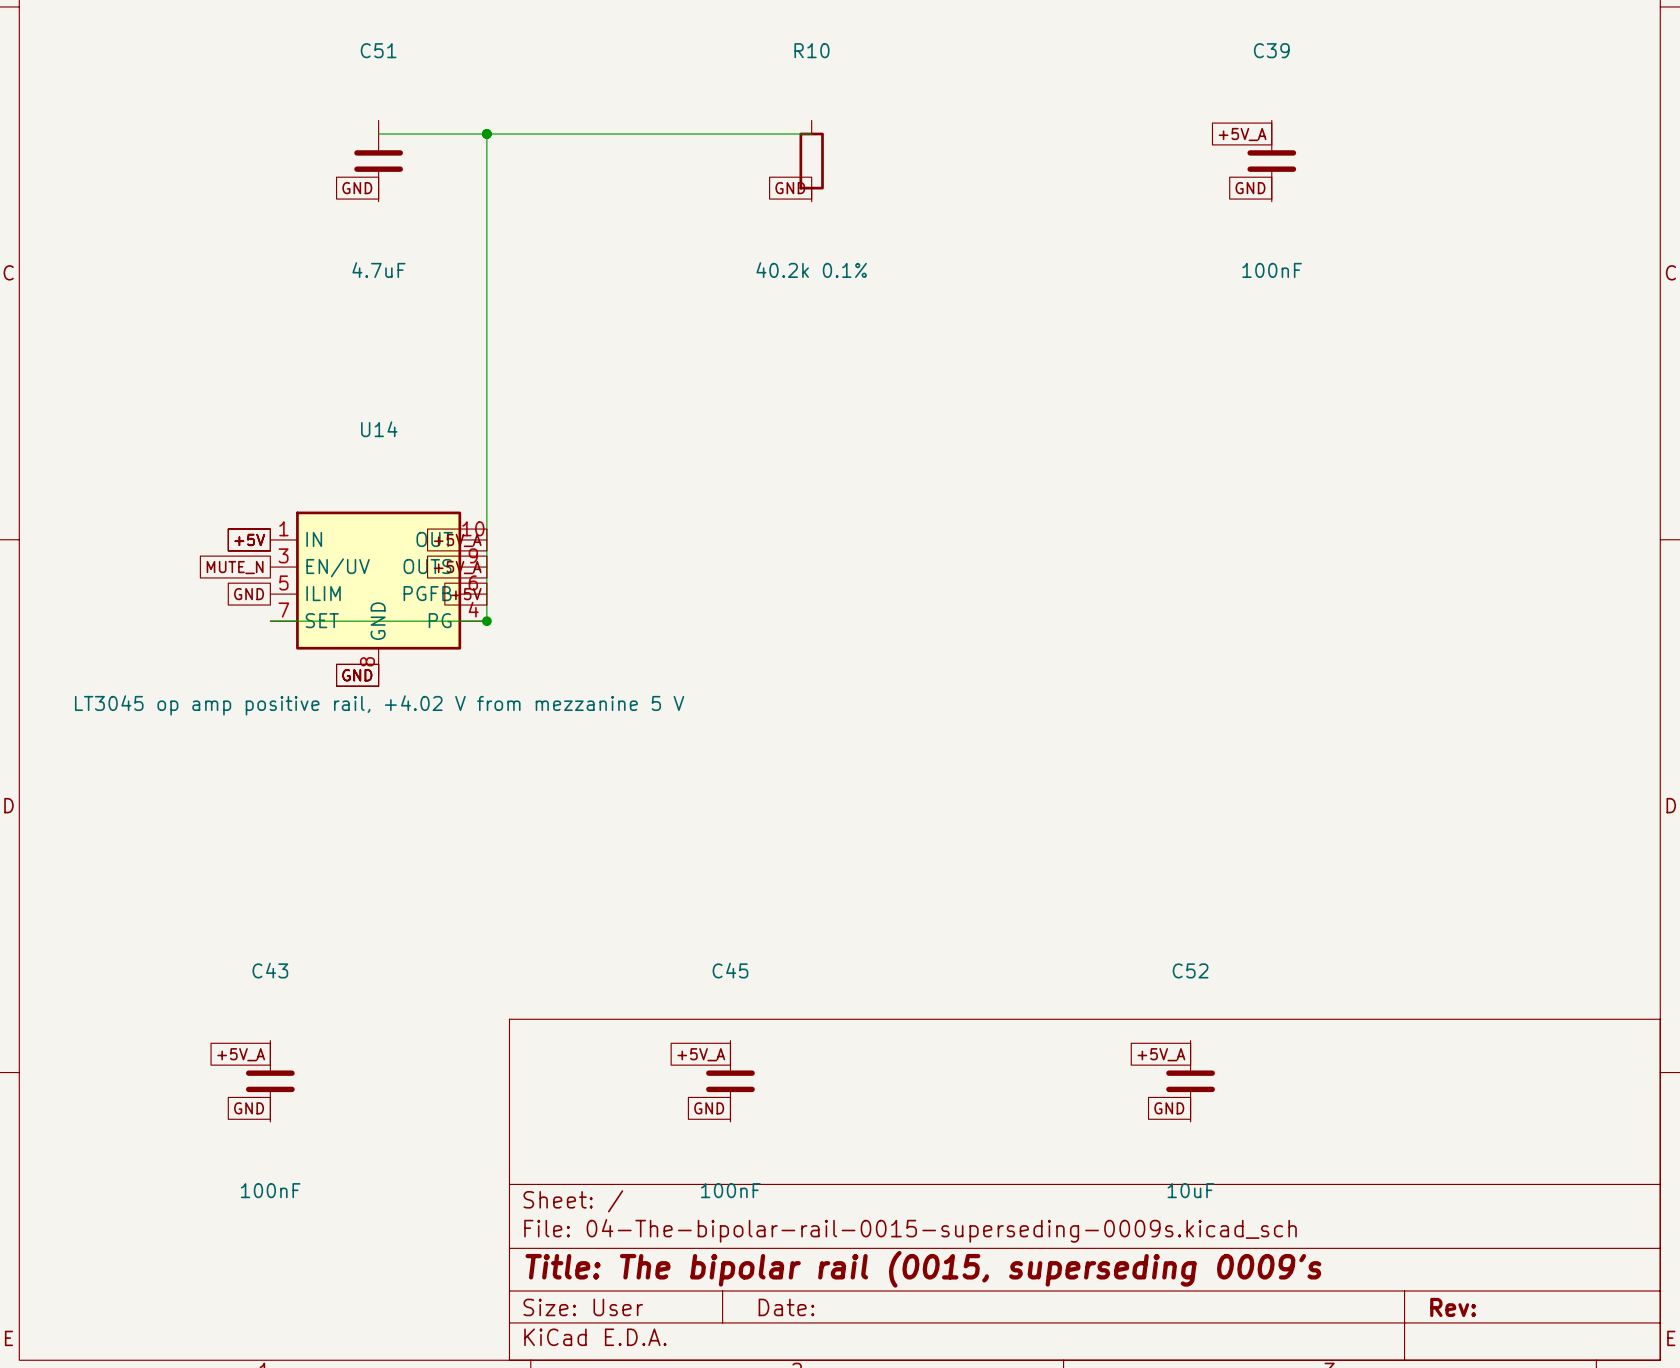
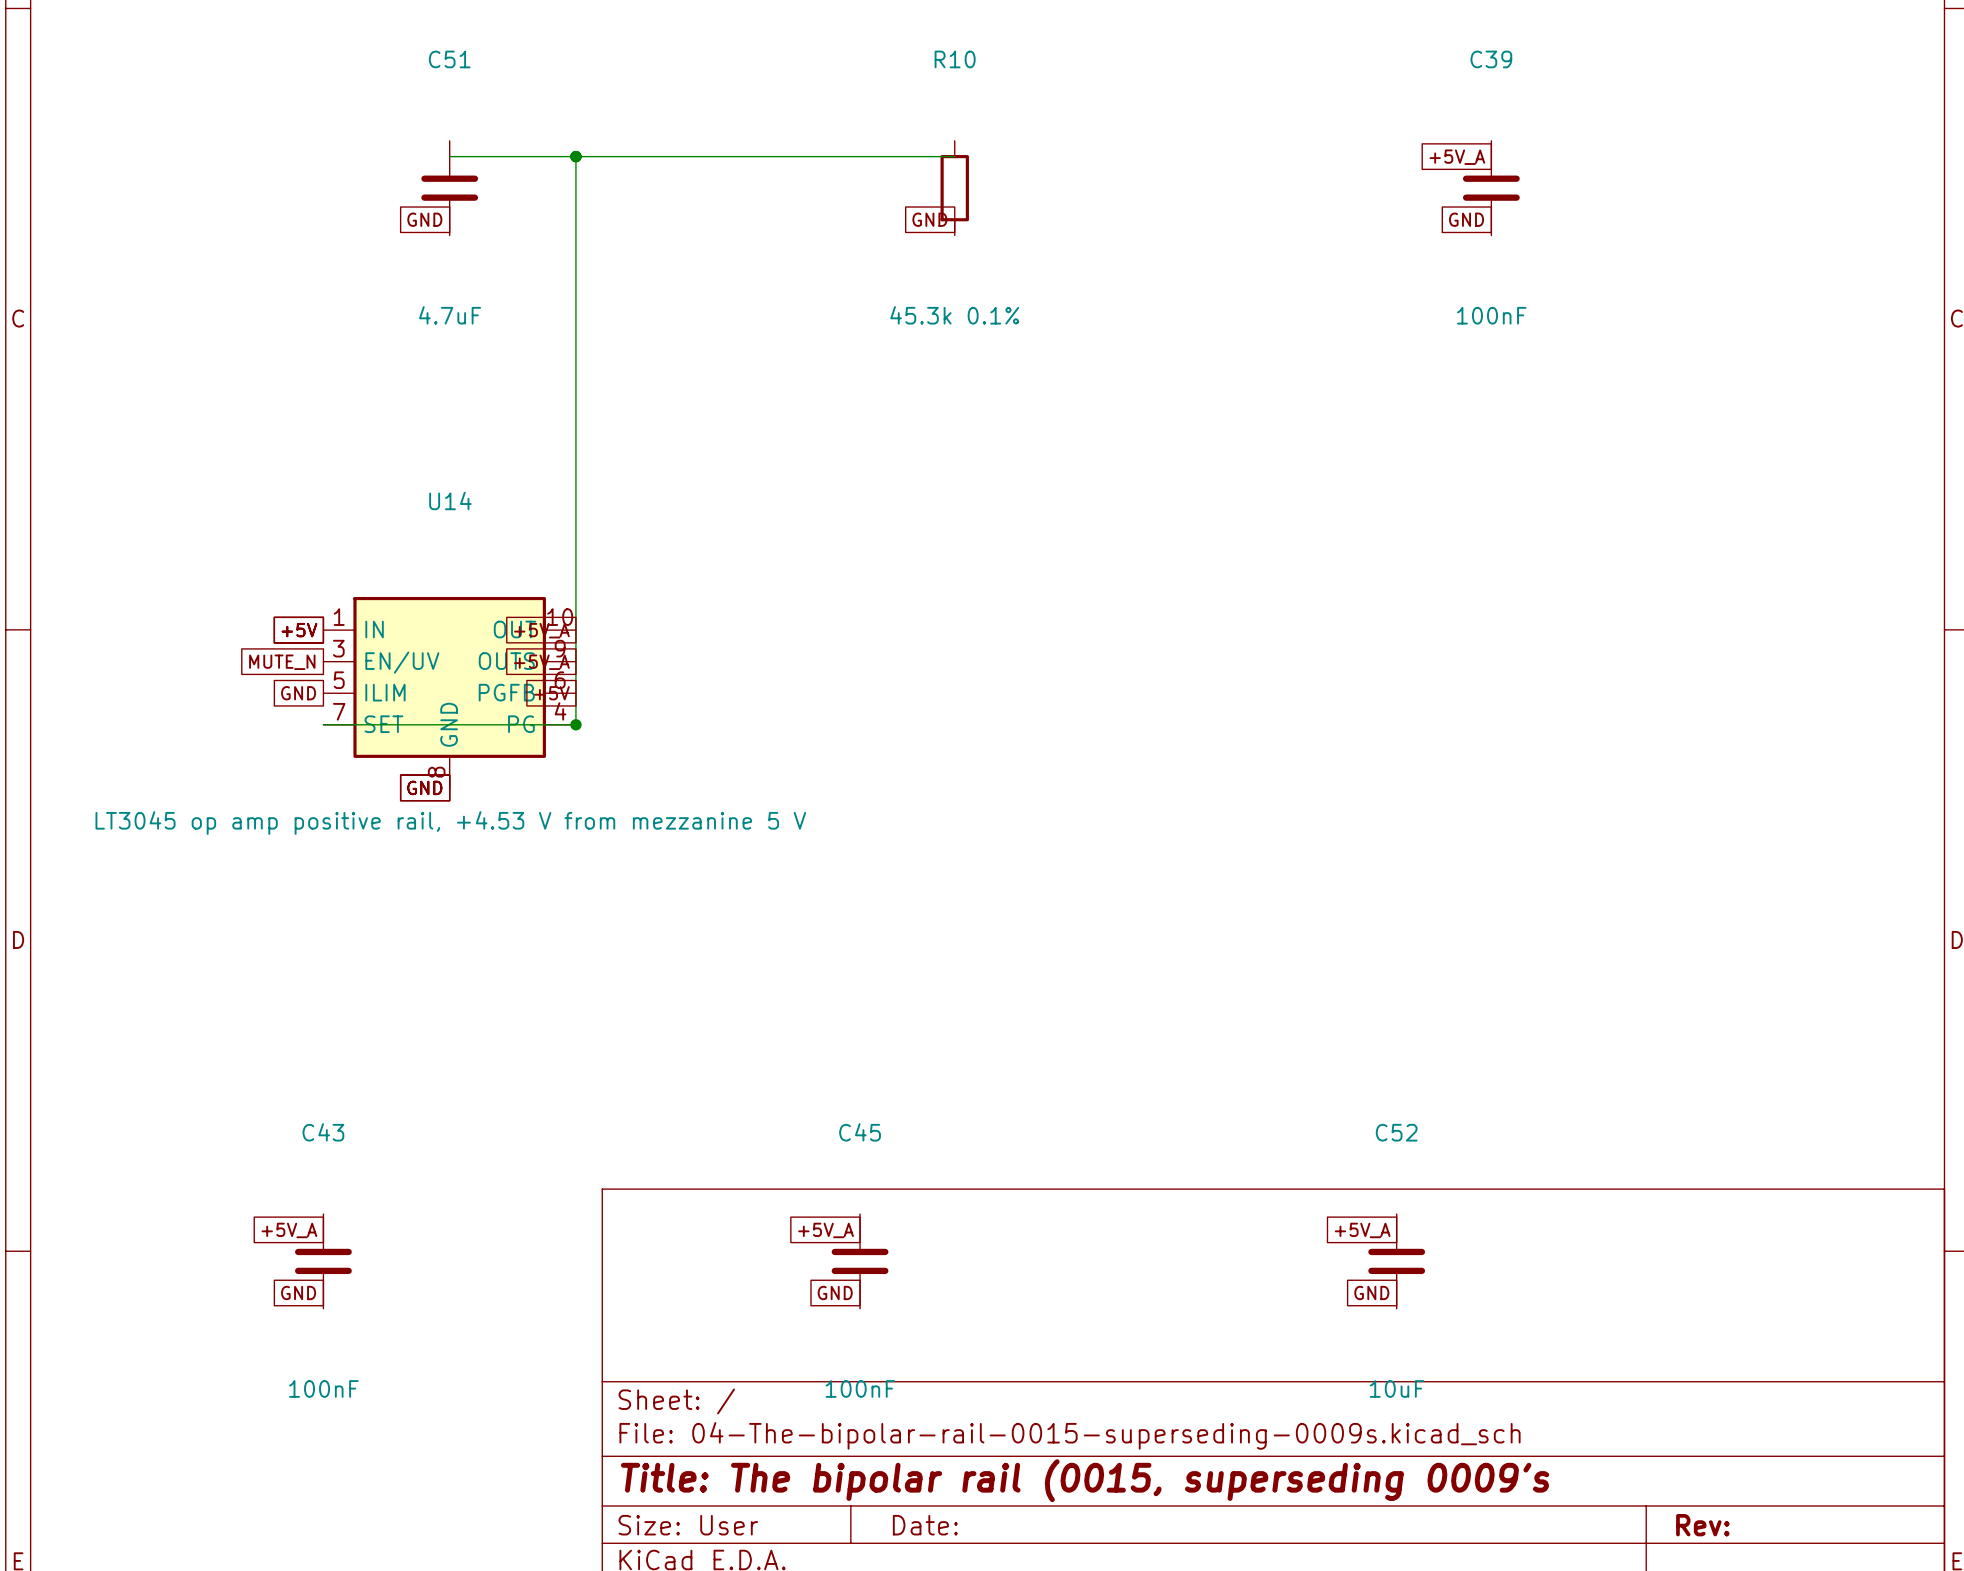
R10 value: 40.2k 0.1% (811, 270) -> 45.3k 0.1% (954, 315)
U14 value: LT3045 op amp positive rail, +4.02 V from mezzanine 5 V (379, 705) -> LT3045 op amp positive rail, +4.53 V from mezzanine 5 V (450, 823)

